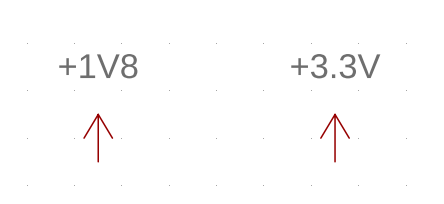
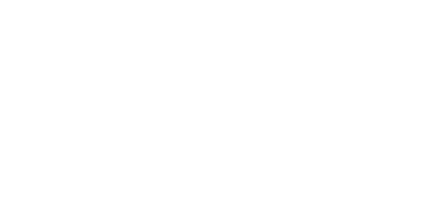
power symbol: +1V8 (98, 138) -> none
power symbol: +3.3V (335, 138) -> none

